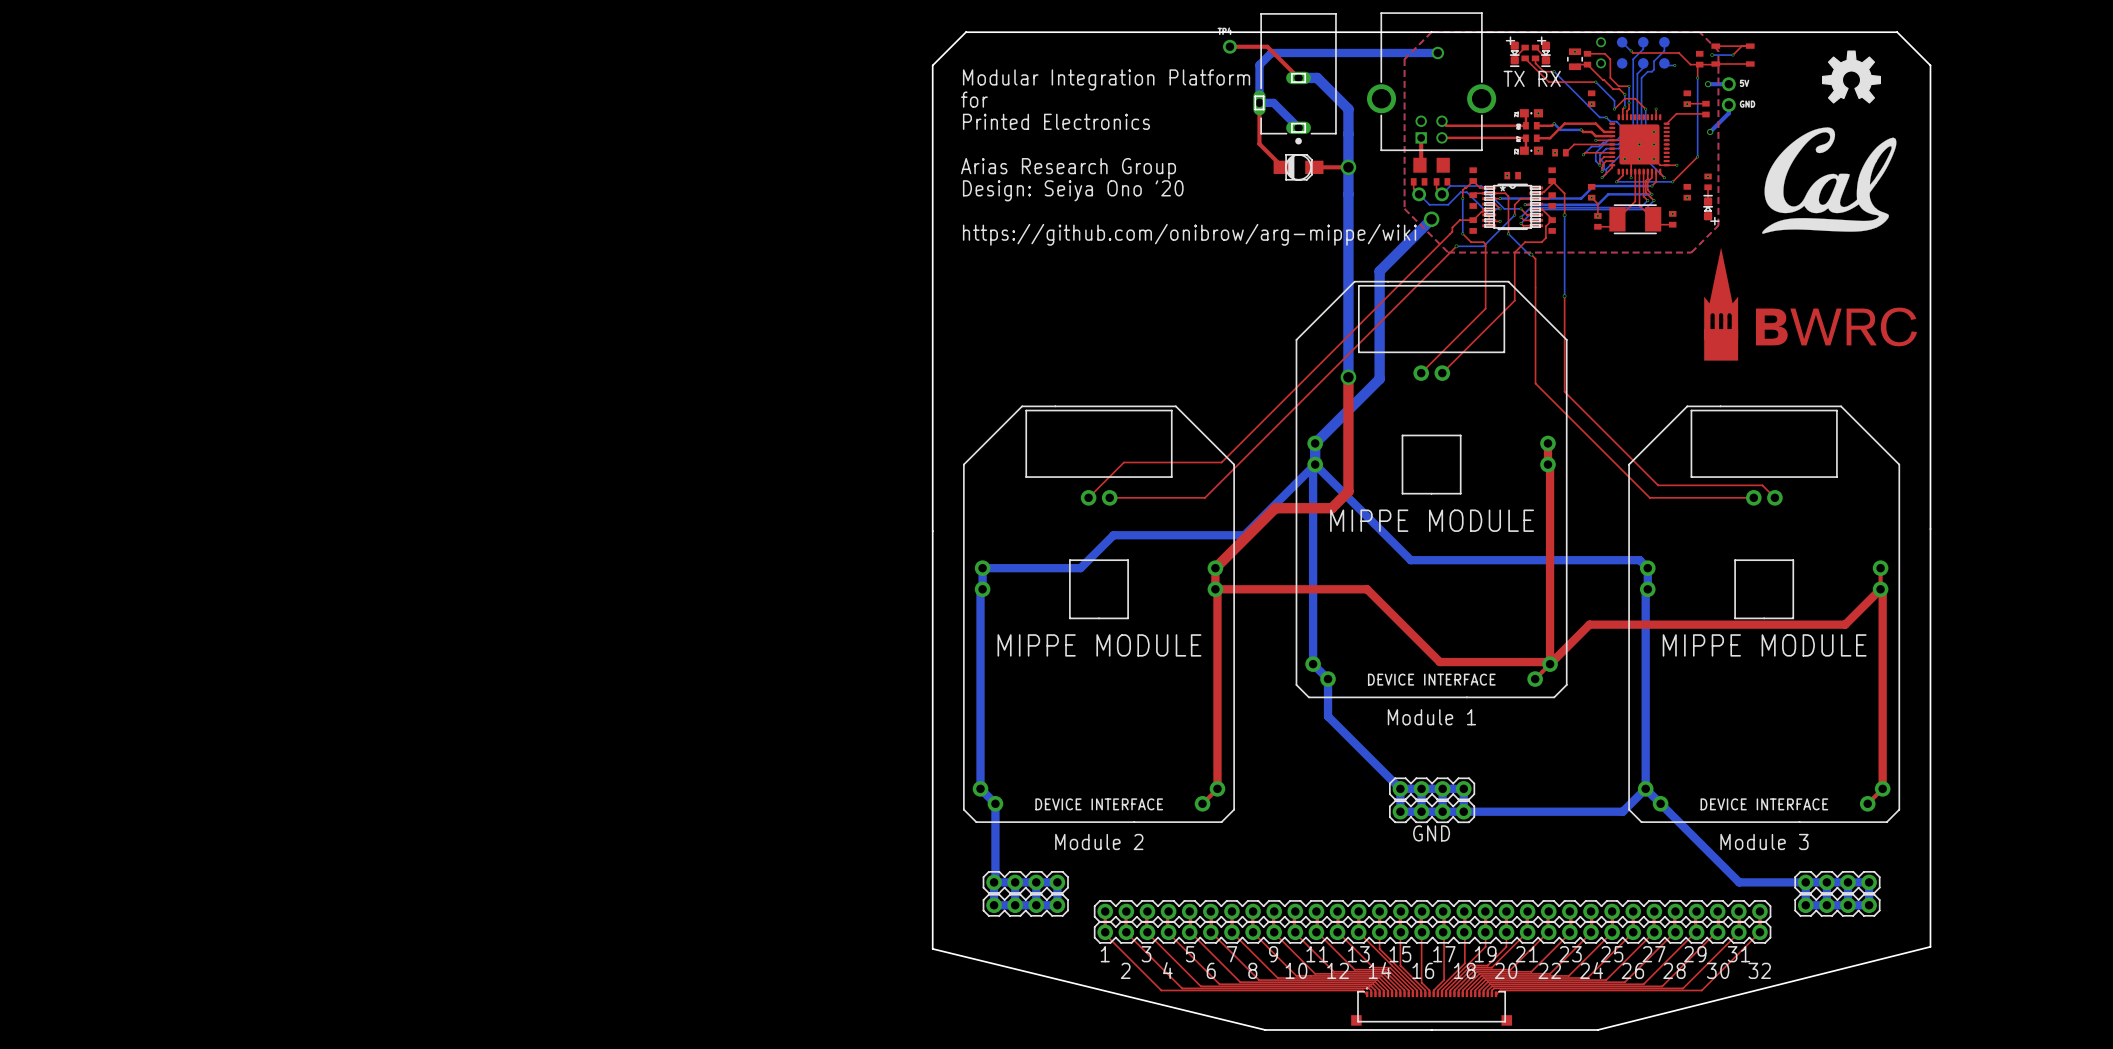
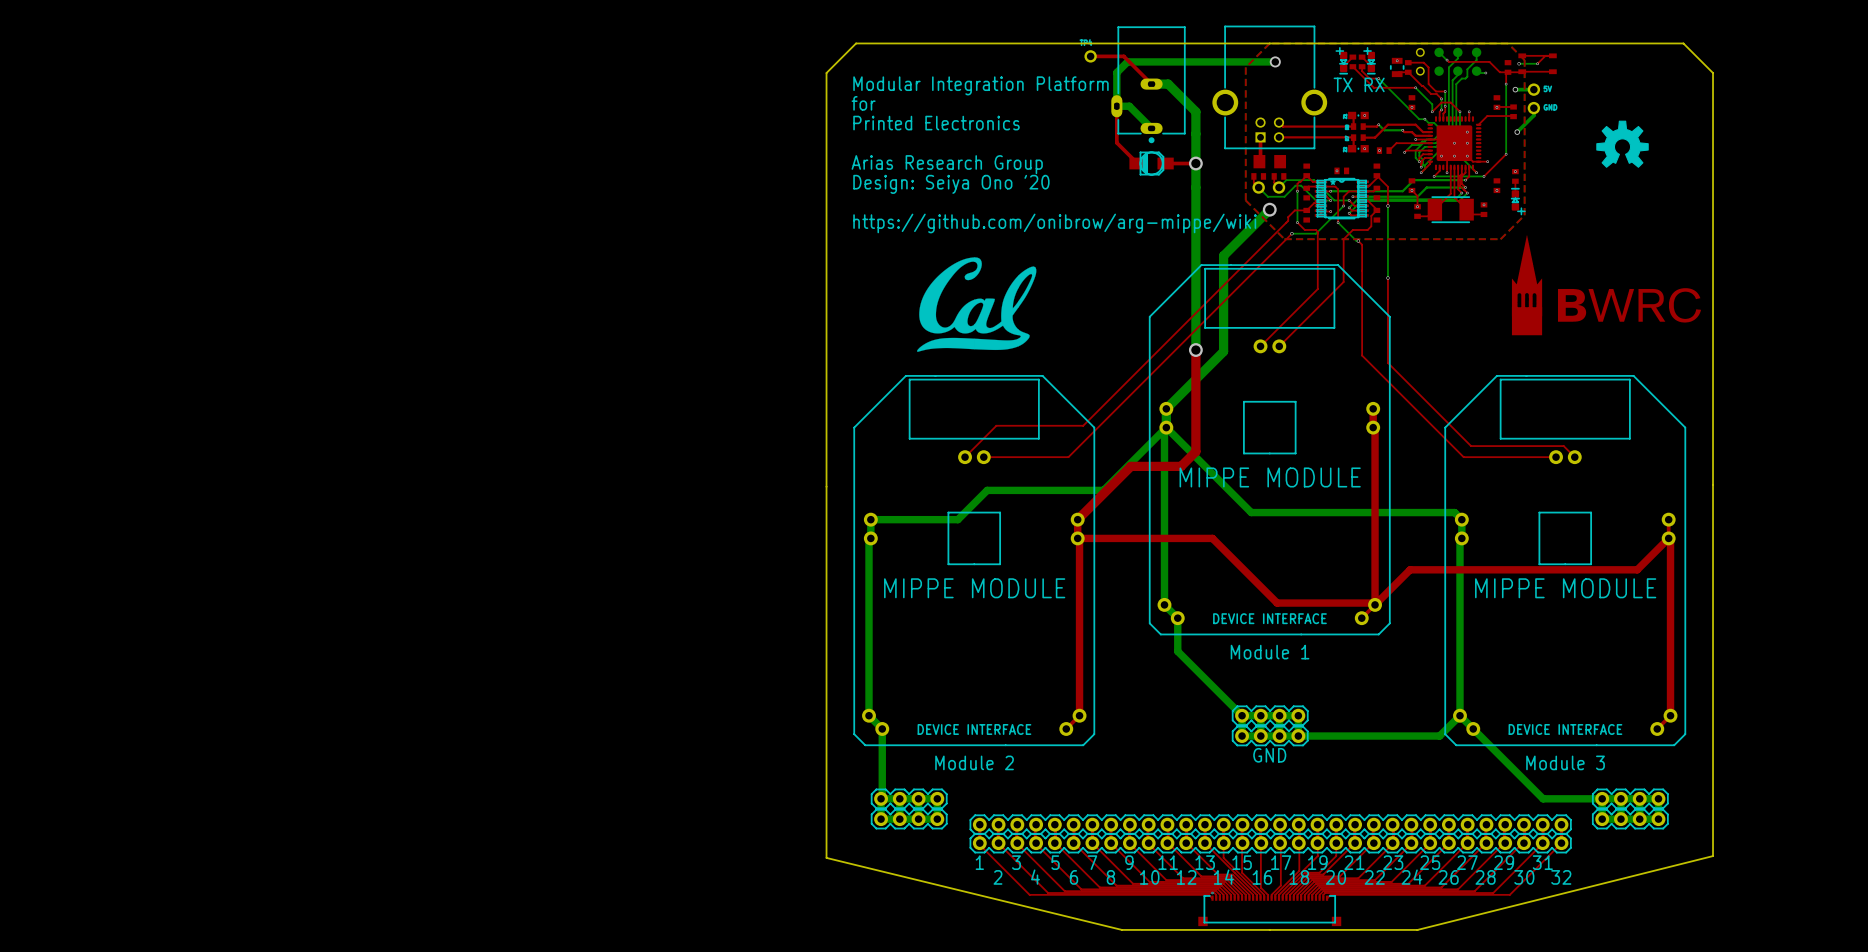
drawing position: (1851, 77) -> (1622, 144)
drawing: [1762, 127, 1897, 234] -> none
drawing: none -> [917, 257, 1037, 352]

